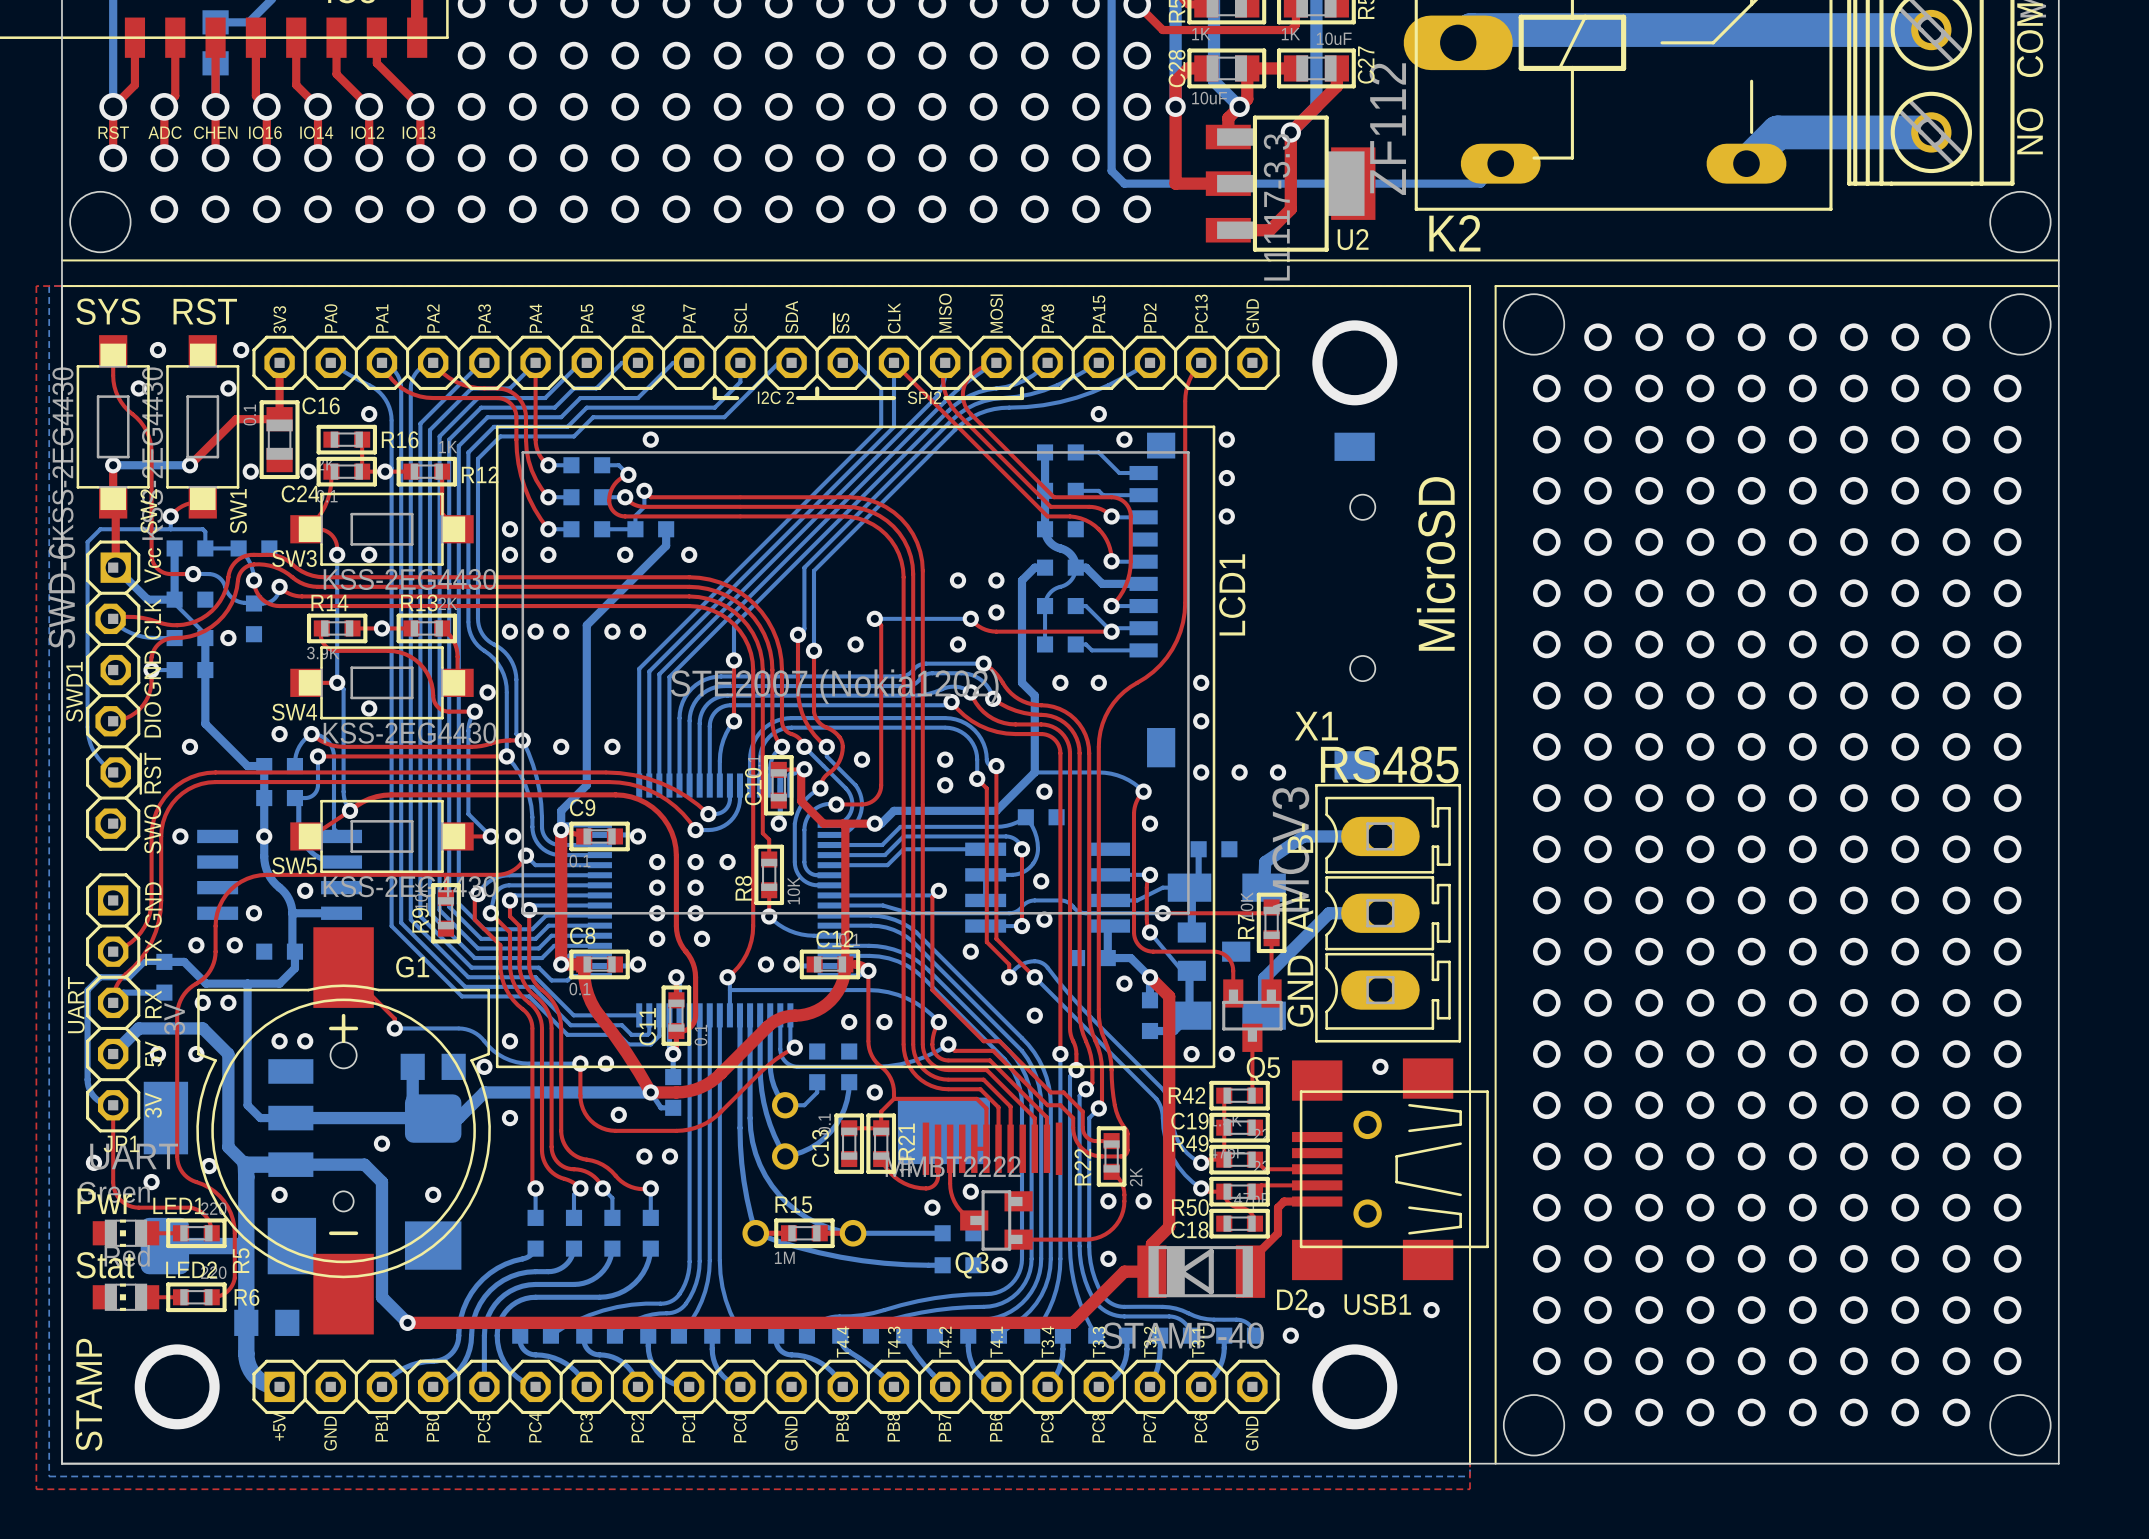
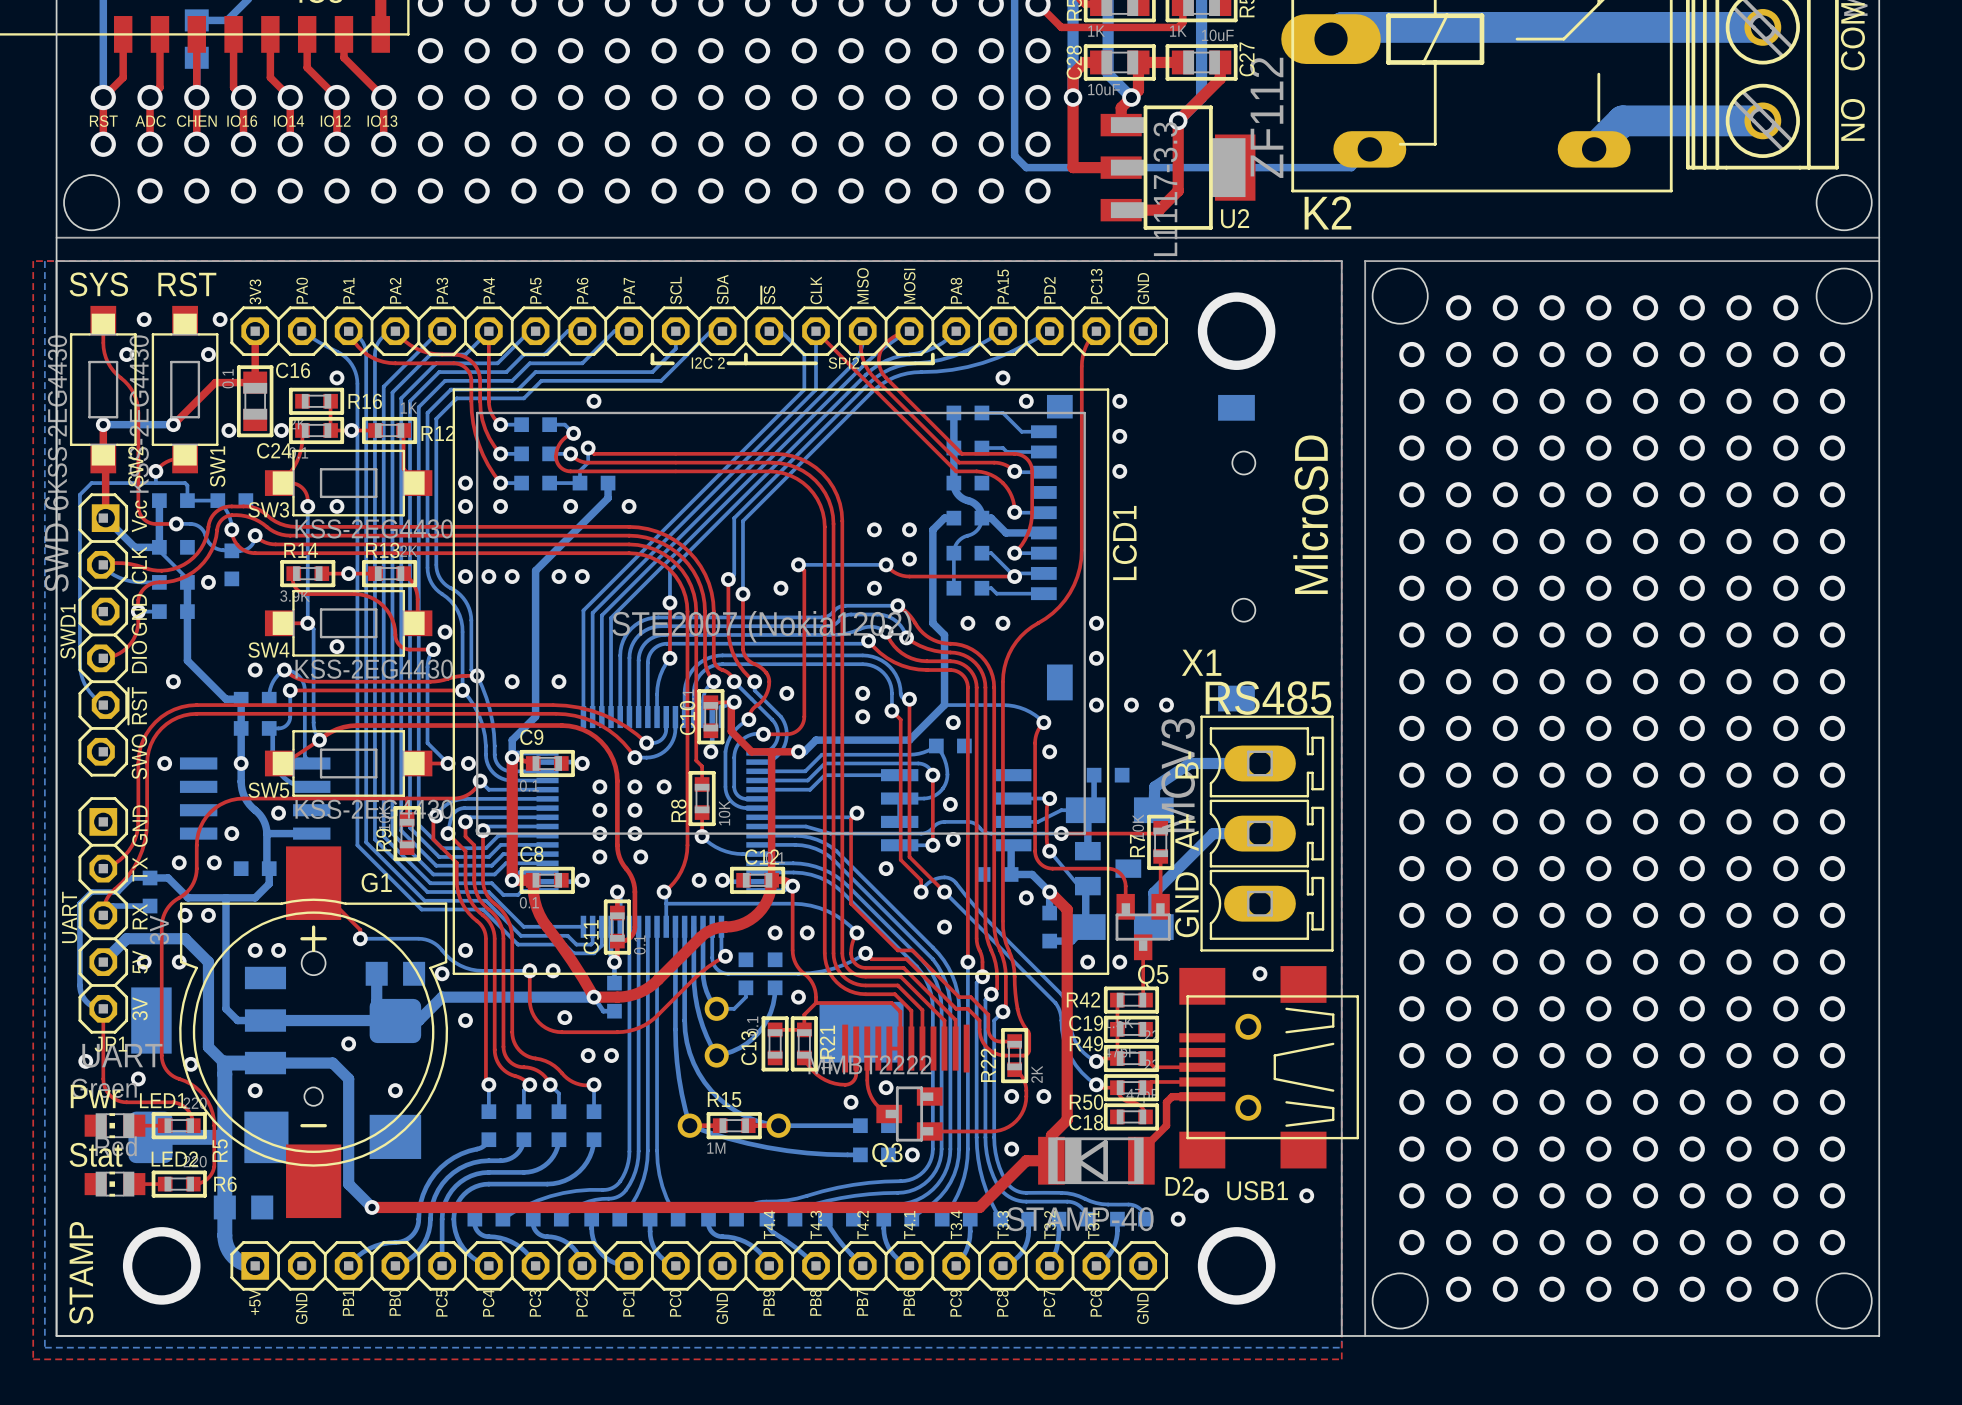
line: (61, 260) (2058, 260) -> none
line: none -> (56, 237) (1879, 237)
line: (61, 286) (1470, 286) (1470, 1463) -> none
line: none -> (56, 261) (1341, 261) (1341, 1335)
line: (2058, 286) (1495, 286) (1495, 1463) -> none
line: none -> (1879, 261) (1365, 261) (1365, 1335)

